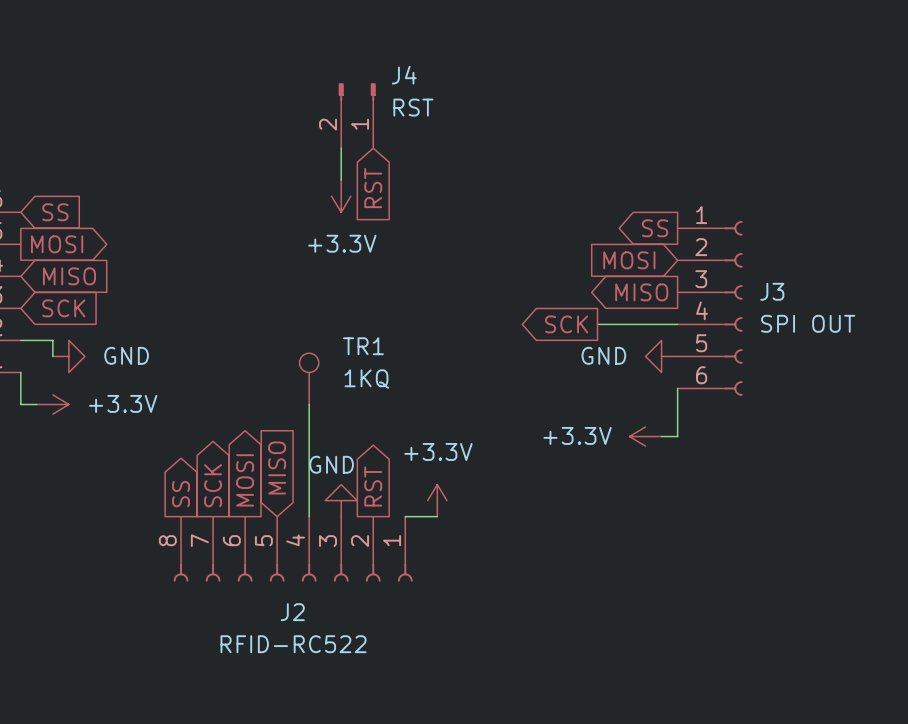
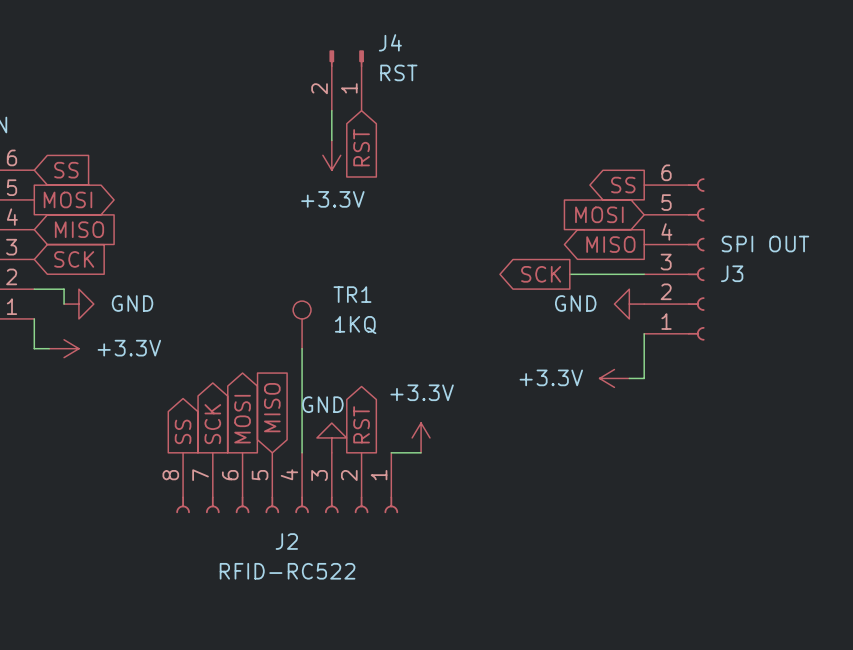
J3 flip: as is (733, 308) -> up-down (696, 259)

